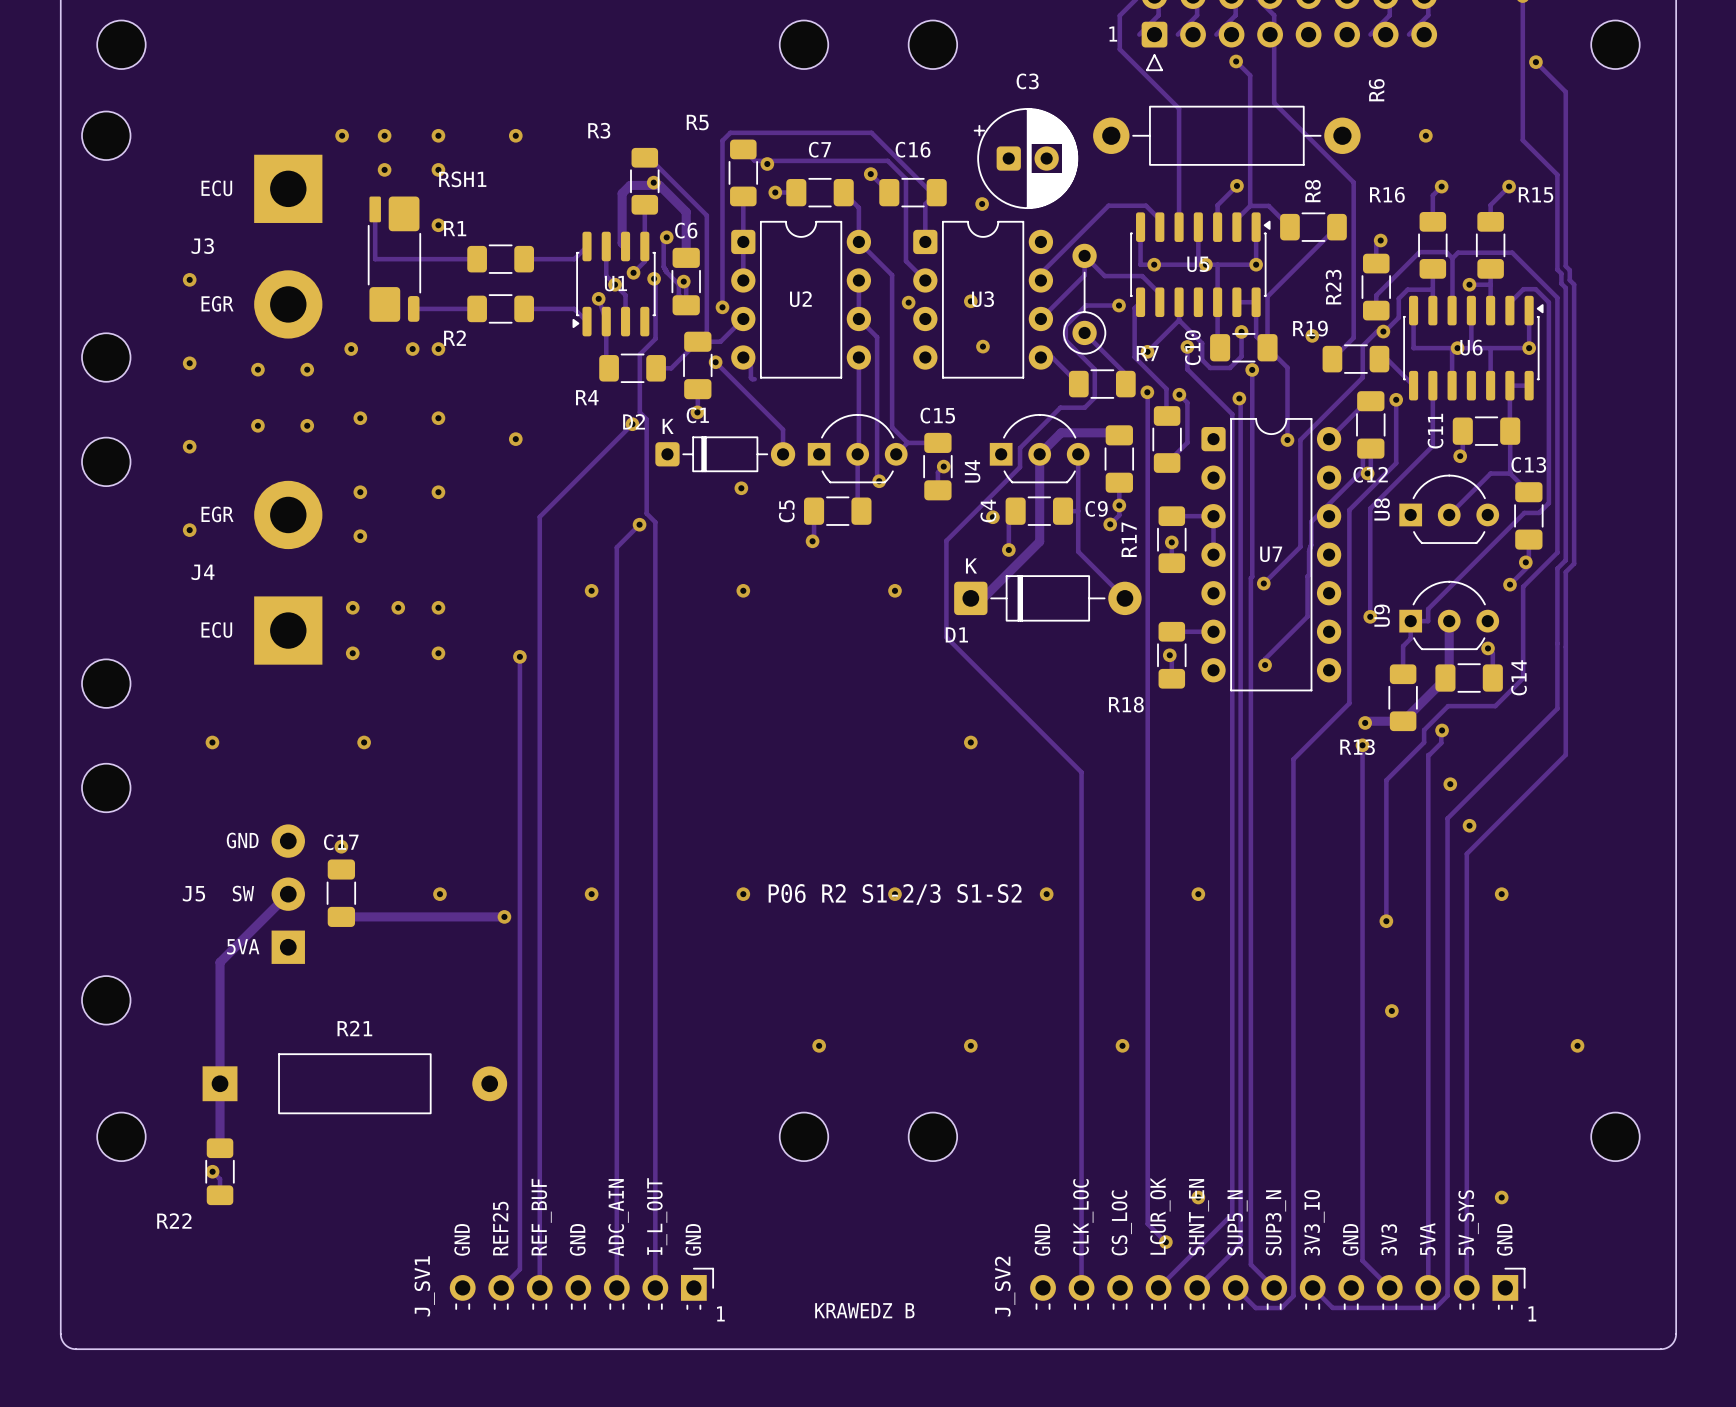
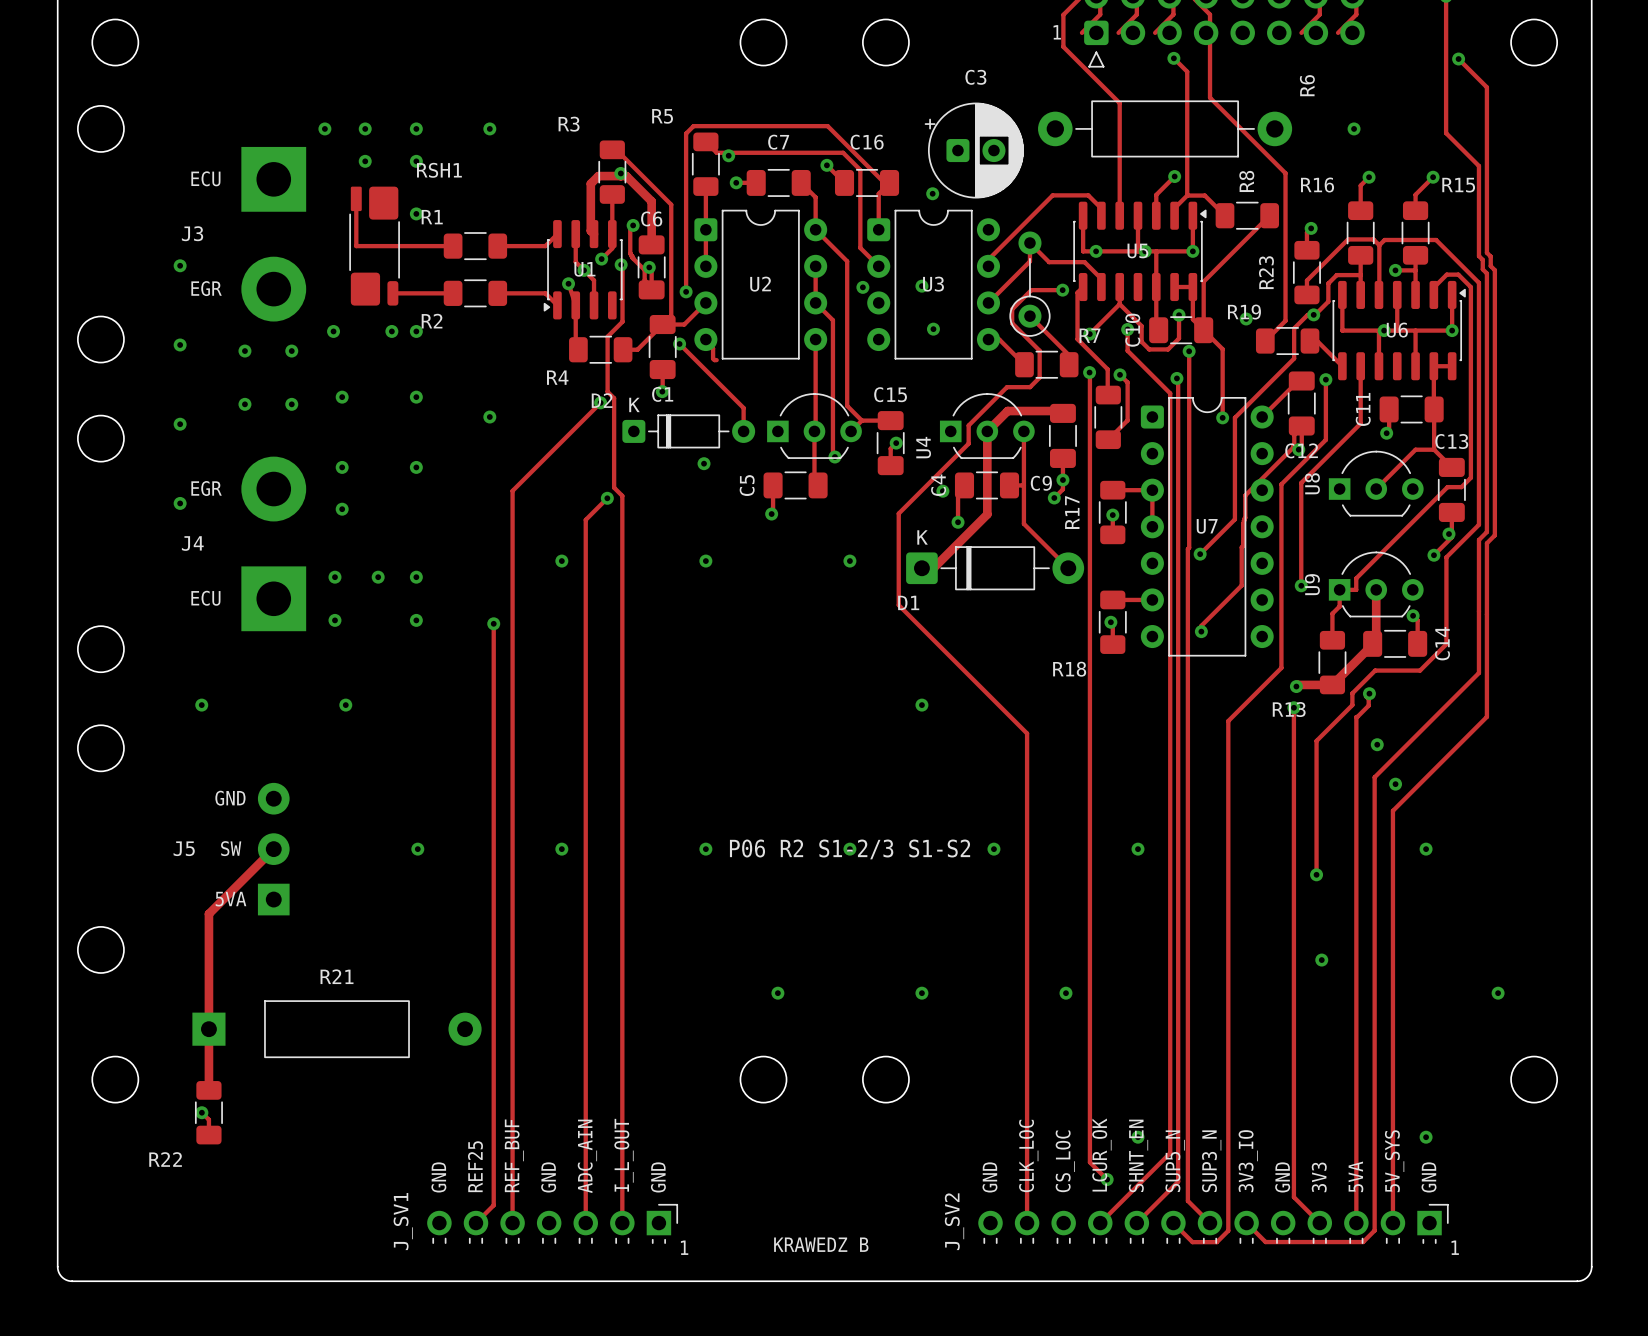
via: (341, 846) -> none
C17: (341, 893) -> none
track: (341, 916) (504, 916) -> none
via: (504, 916) -> none

